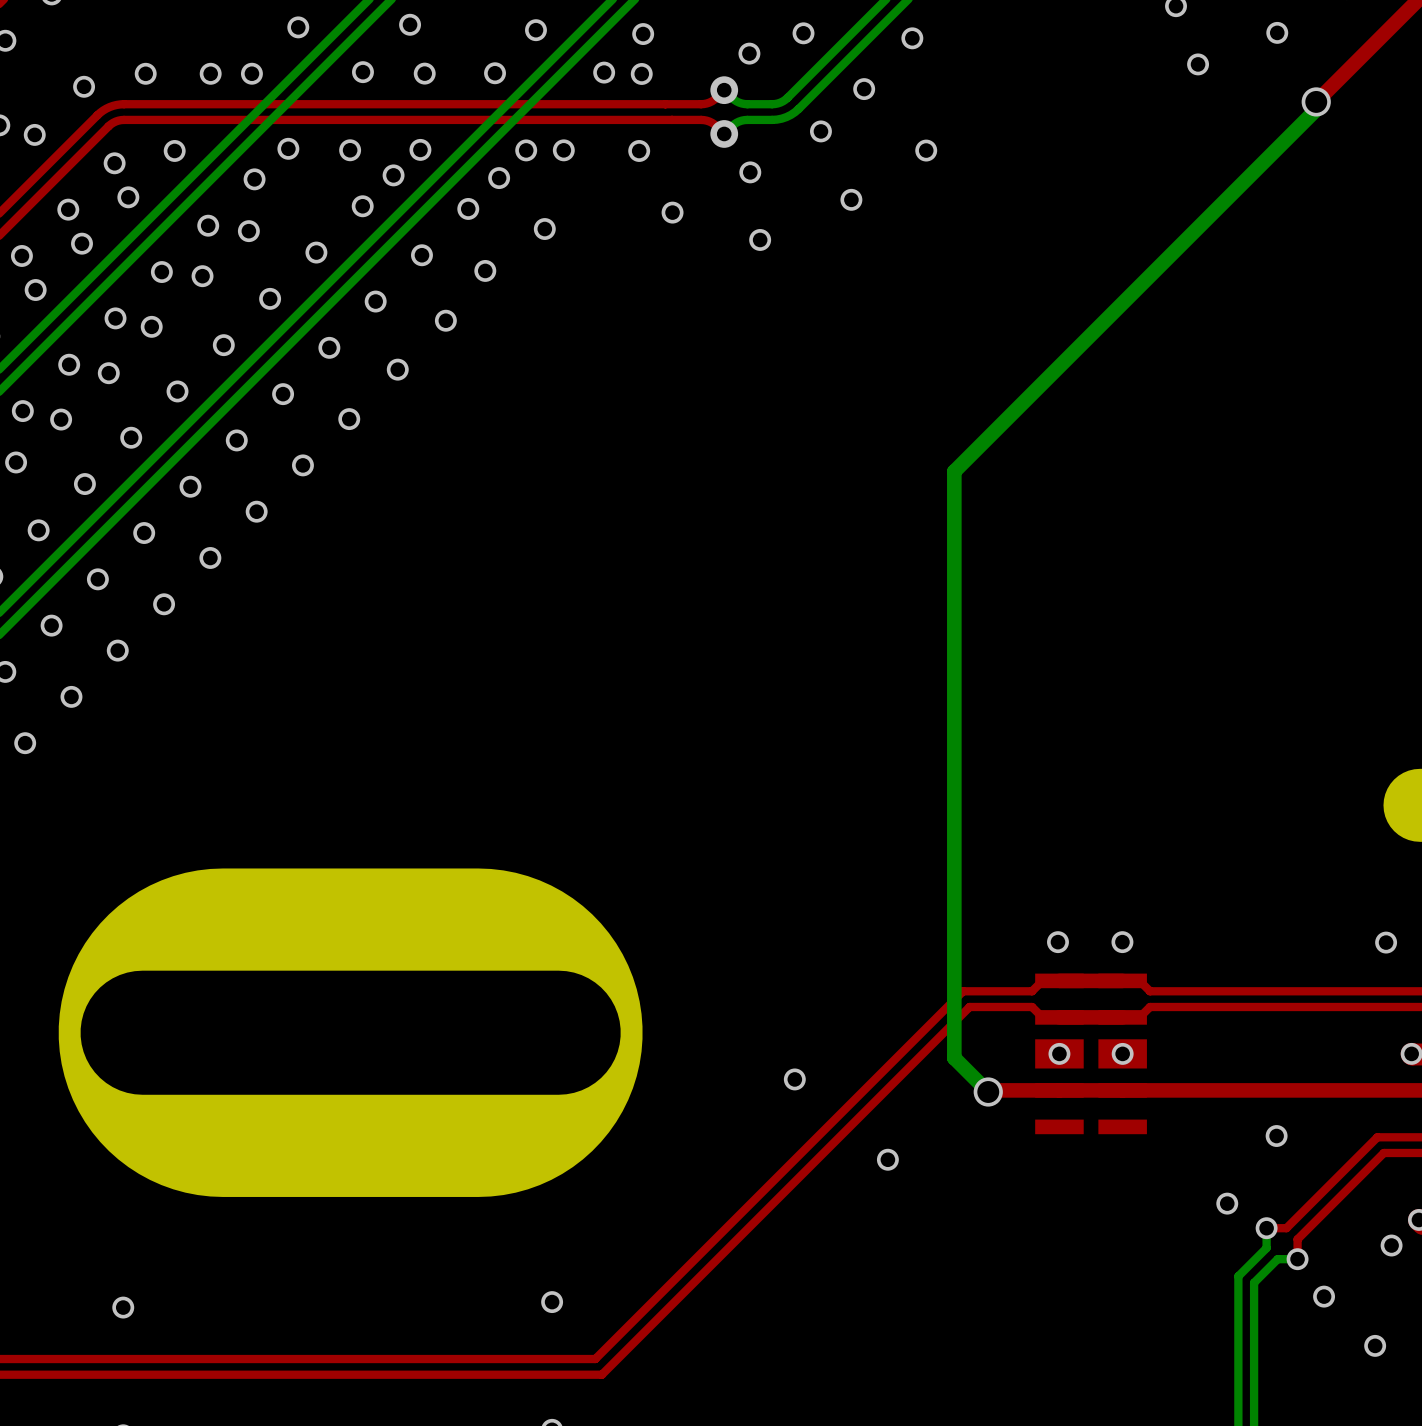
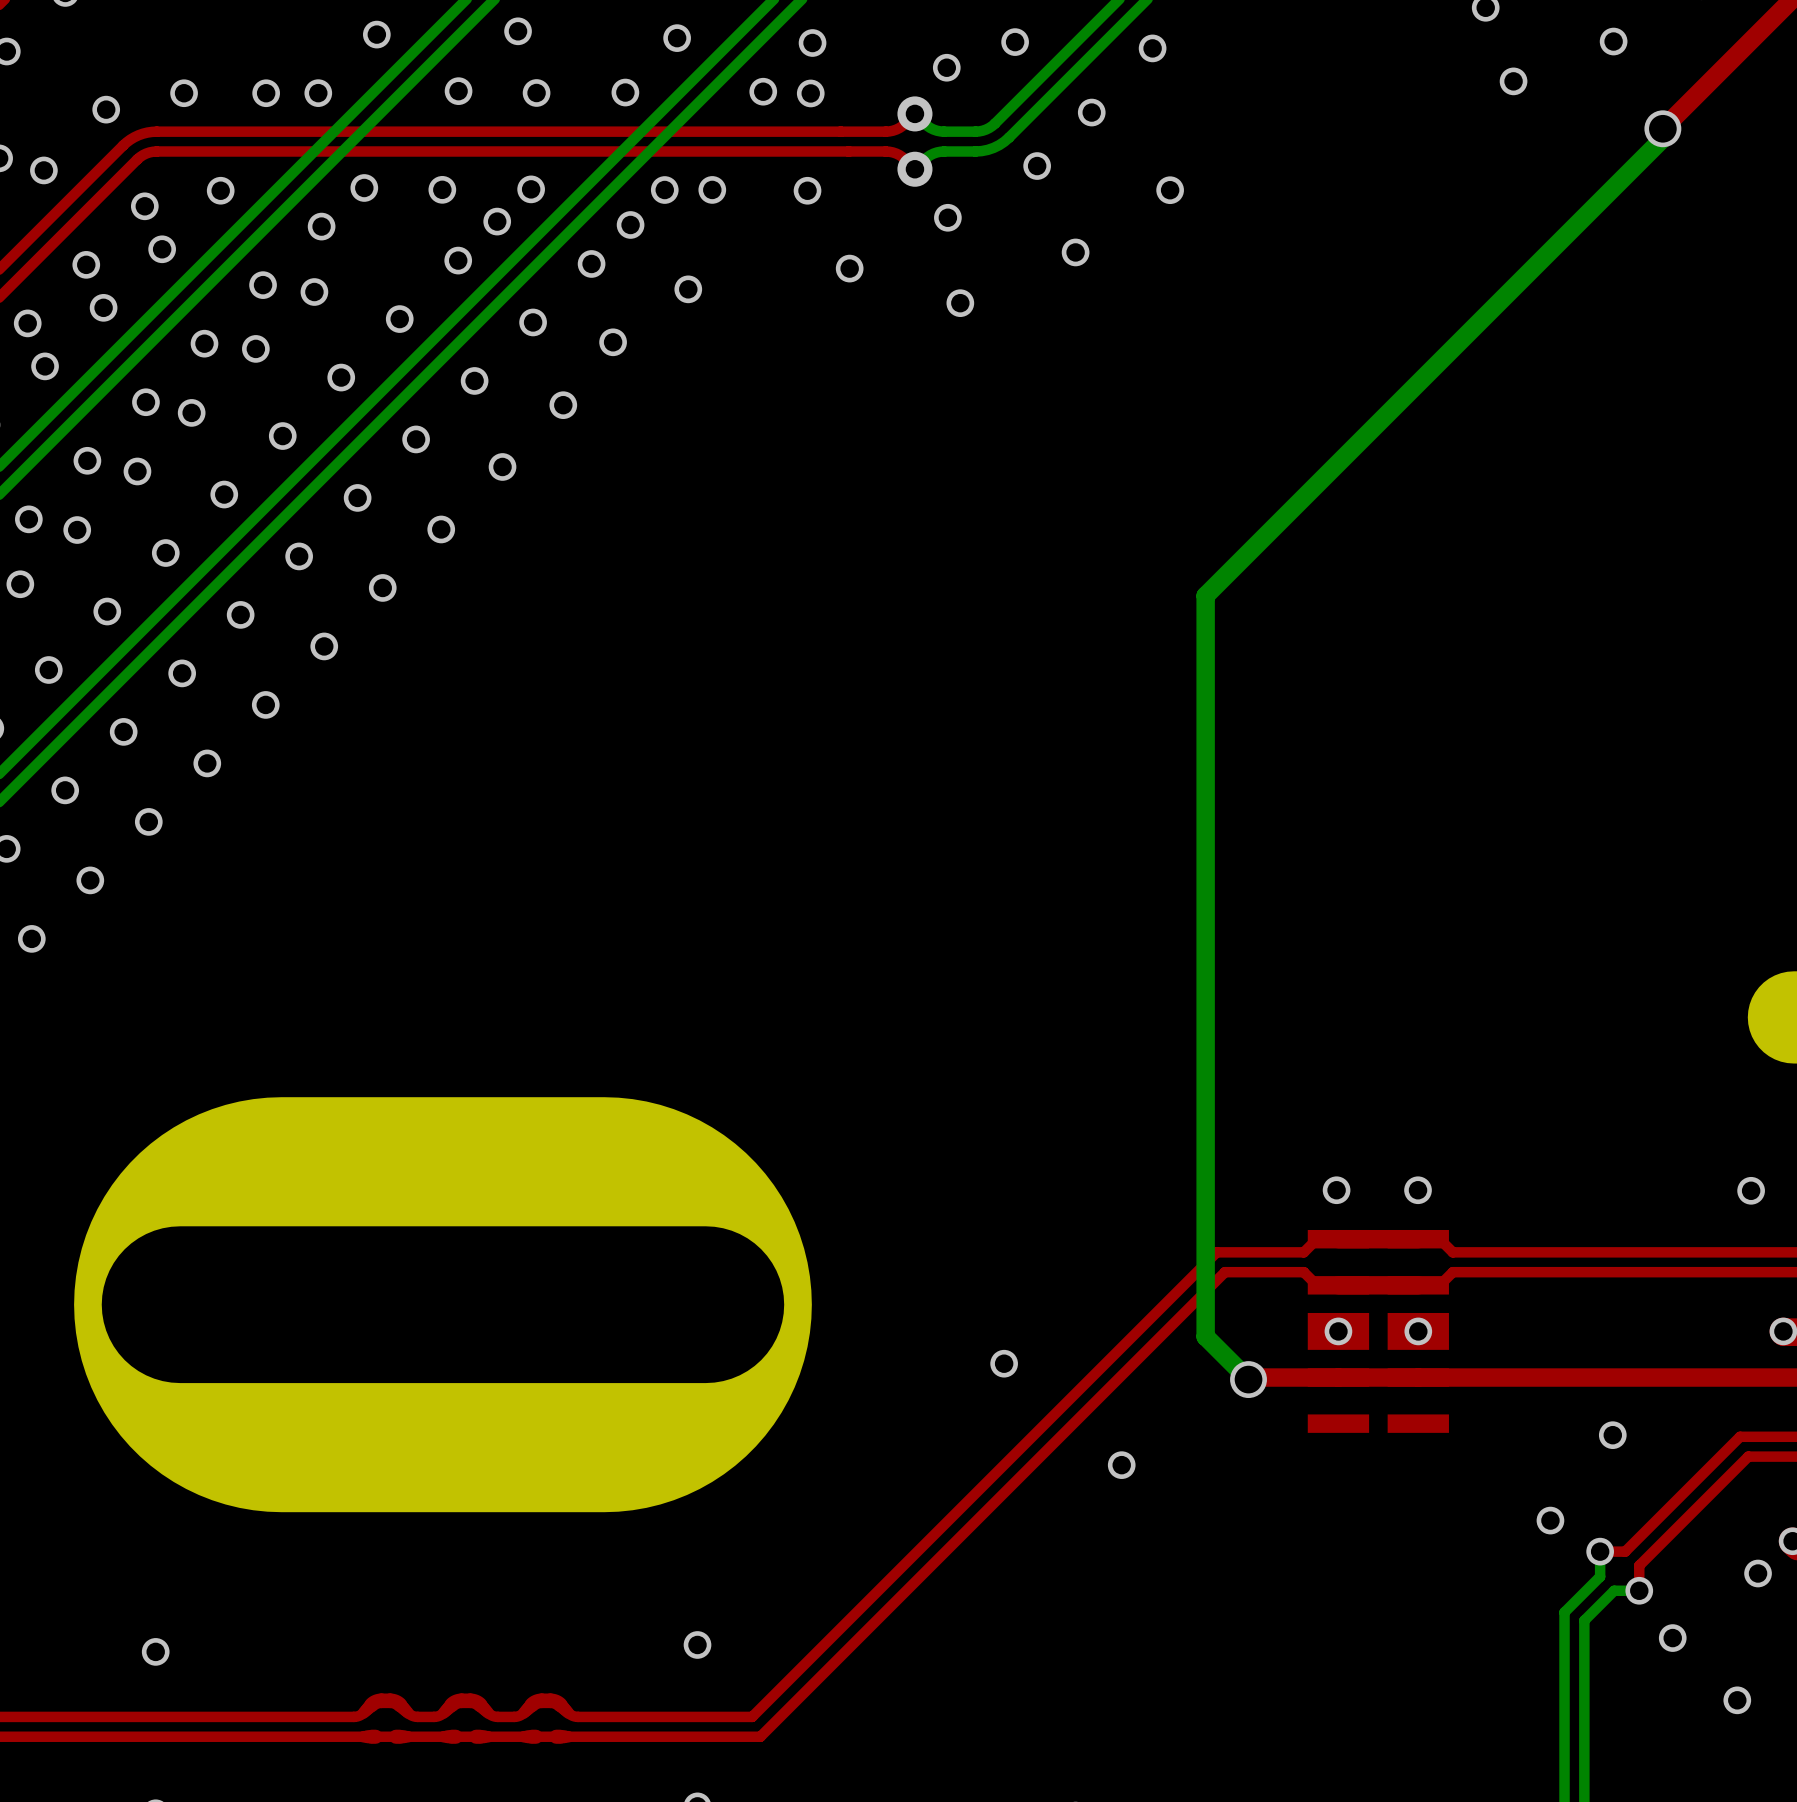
top track: (330, 1359) (280, 1359) -> (417, 1716) (410, 1715) (397, 1703) (390, 1700) (376, 1701) (362, 1714) (353, 1716)
top track: (394, 1359) (343, 1359) -> (497, 1716) (491, 1715) (478, 1703) (470, 1700) (456, 1701) (442, 1714) (433, 1716)
top track: (457, 1359) (406, 1359) -> (578, 1716) (569, 1714) (557, 1702) (550, 1700) (536, 1701) (522, 1714) (514, 1716)

